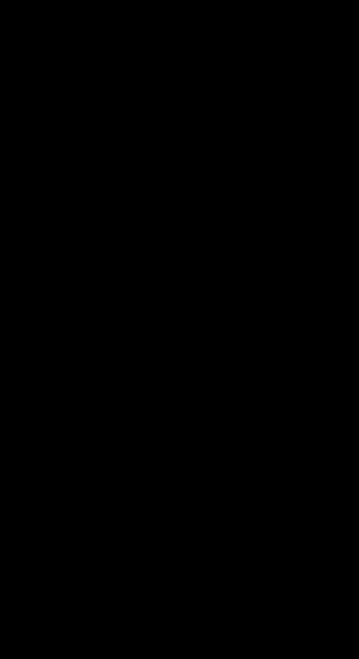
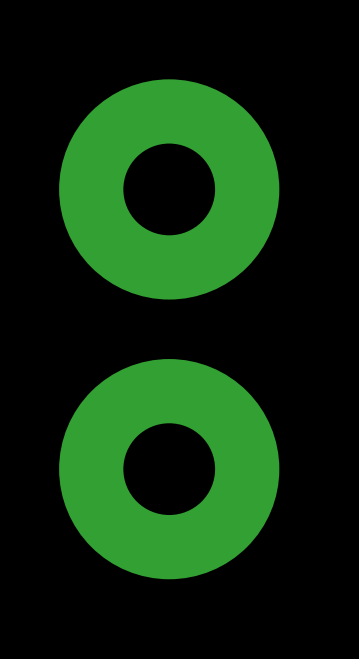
part: none -> (169, 329)

